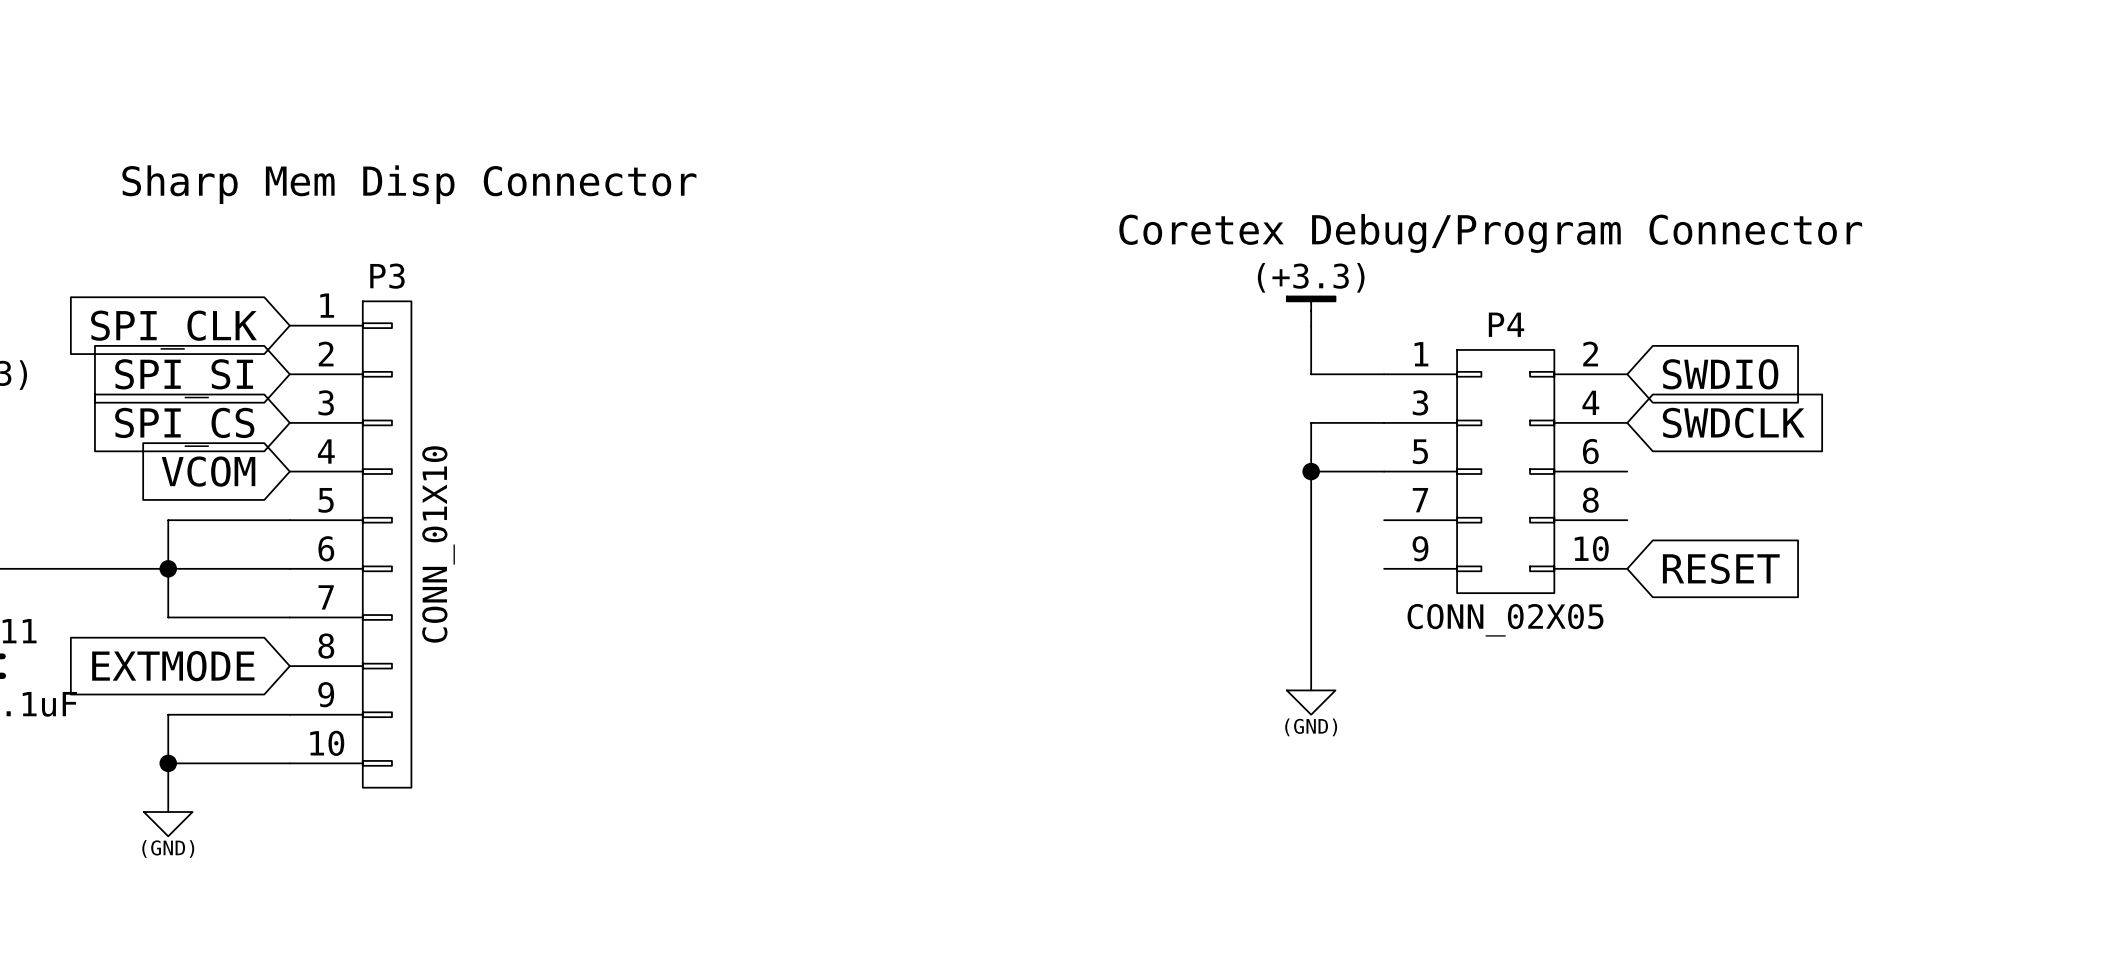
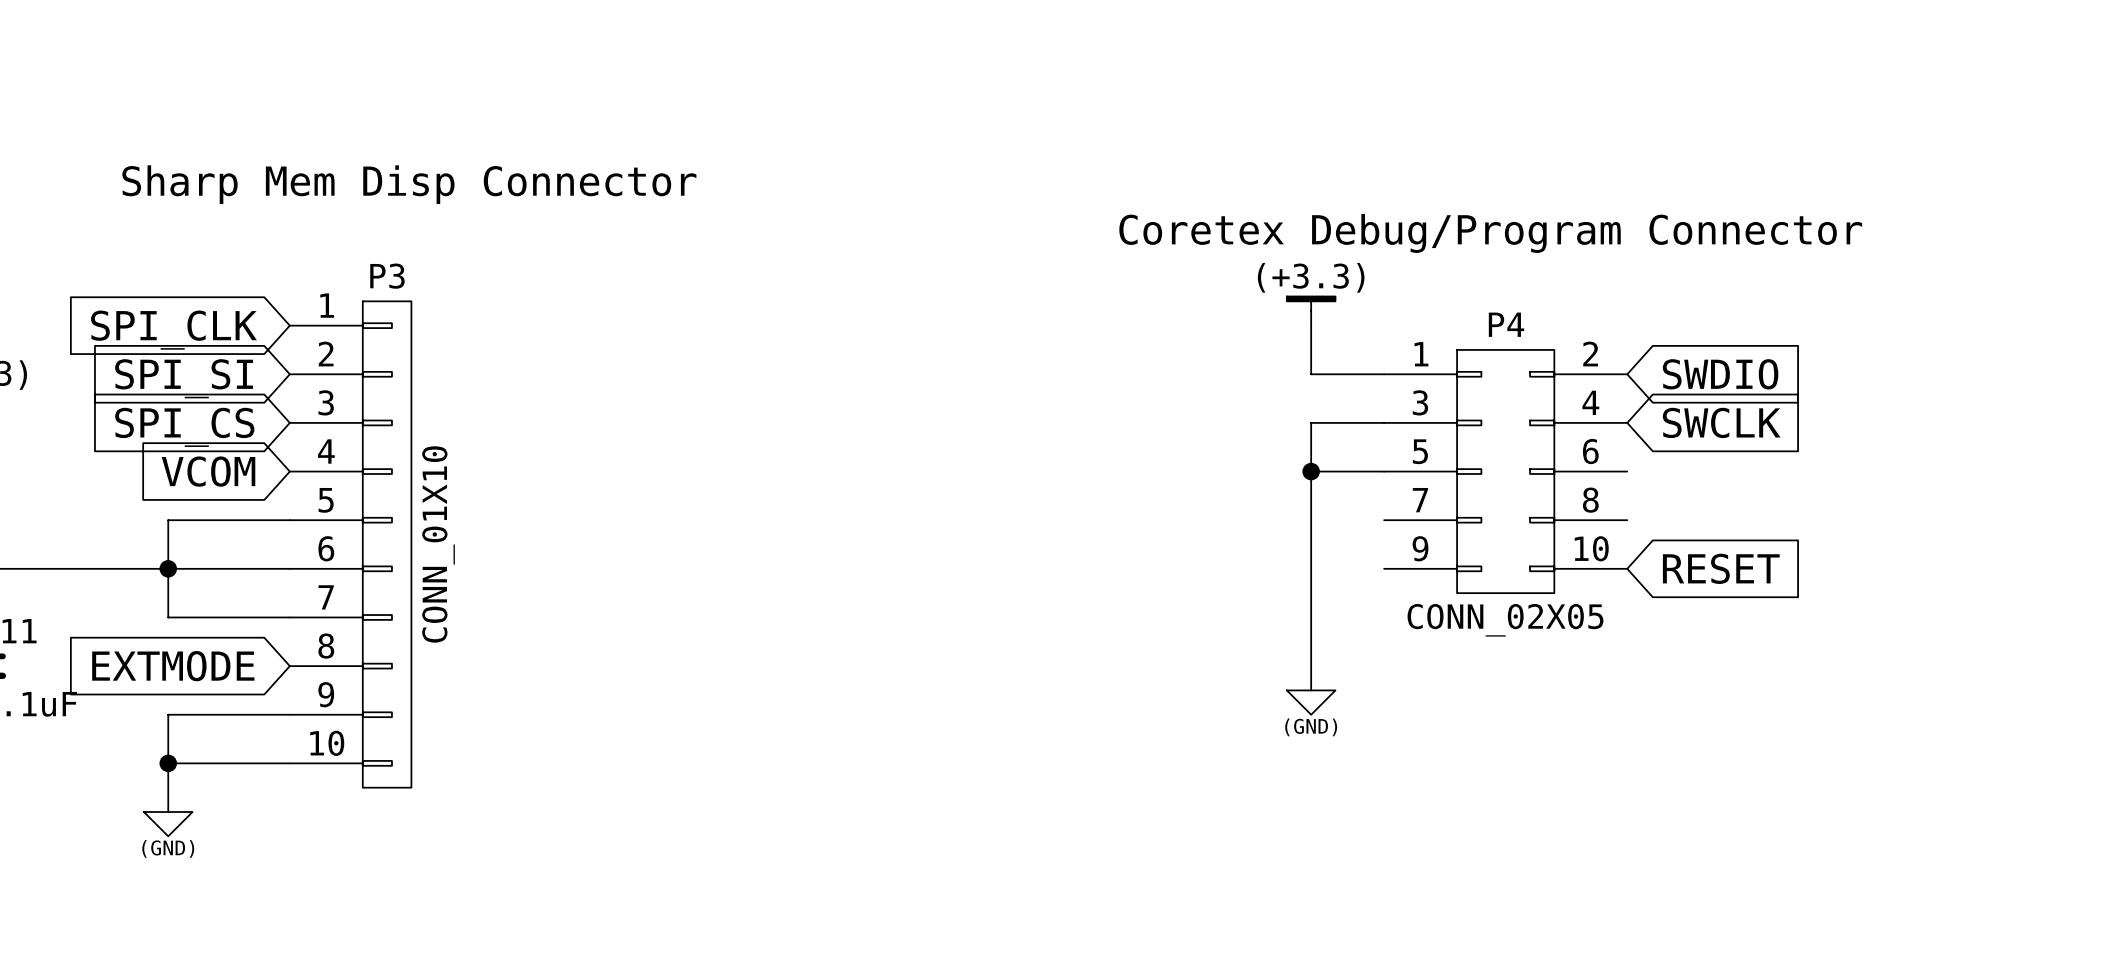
global label: SWDCLK (1733, 422) -> SWCLK (1721, 422)

